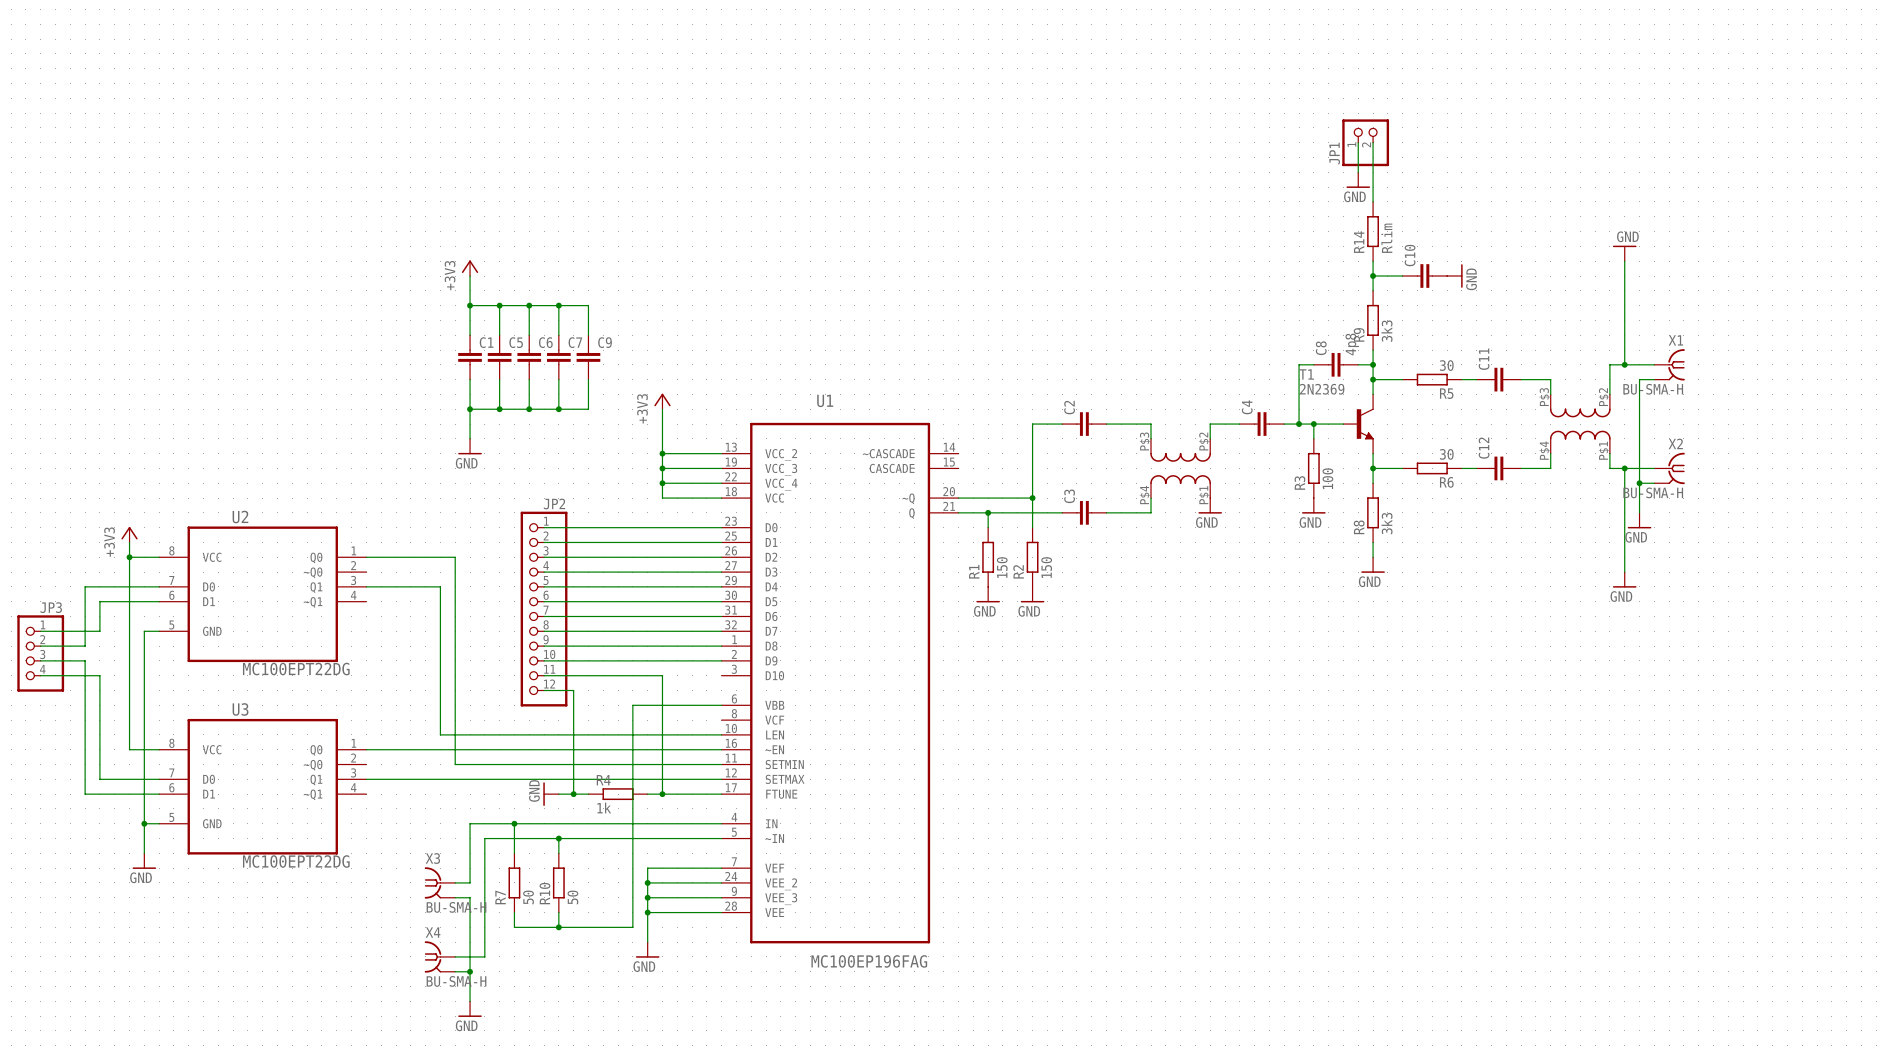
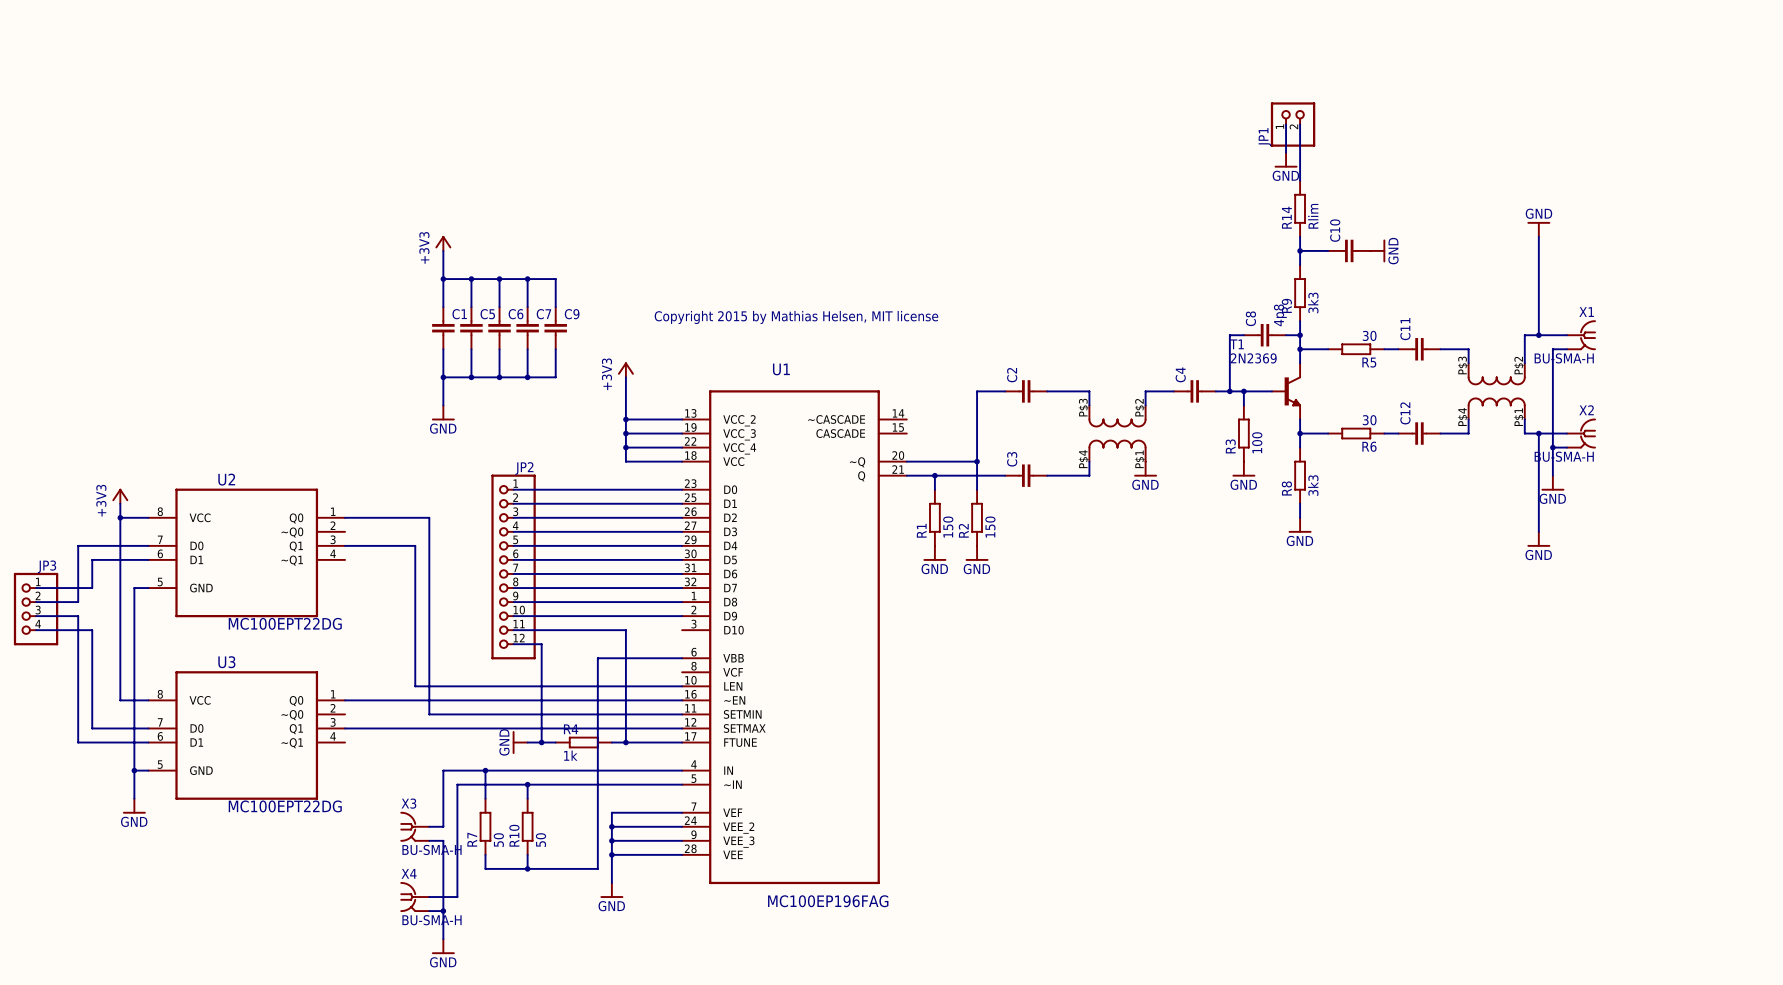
text: none -> Copyright 2015 by Mathias Helsen, MIT license (796, 317)

